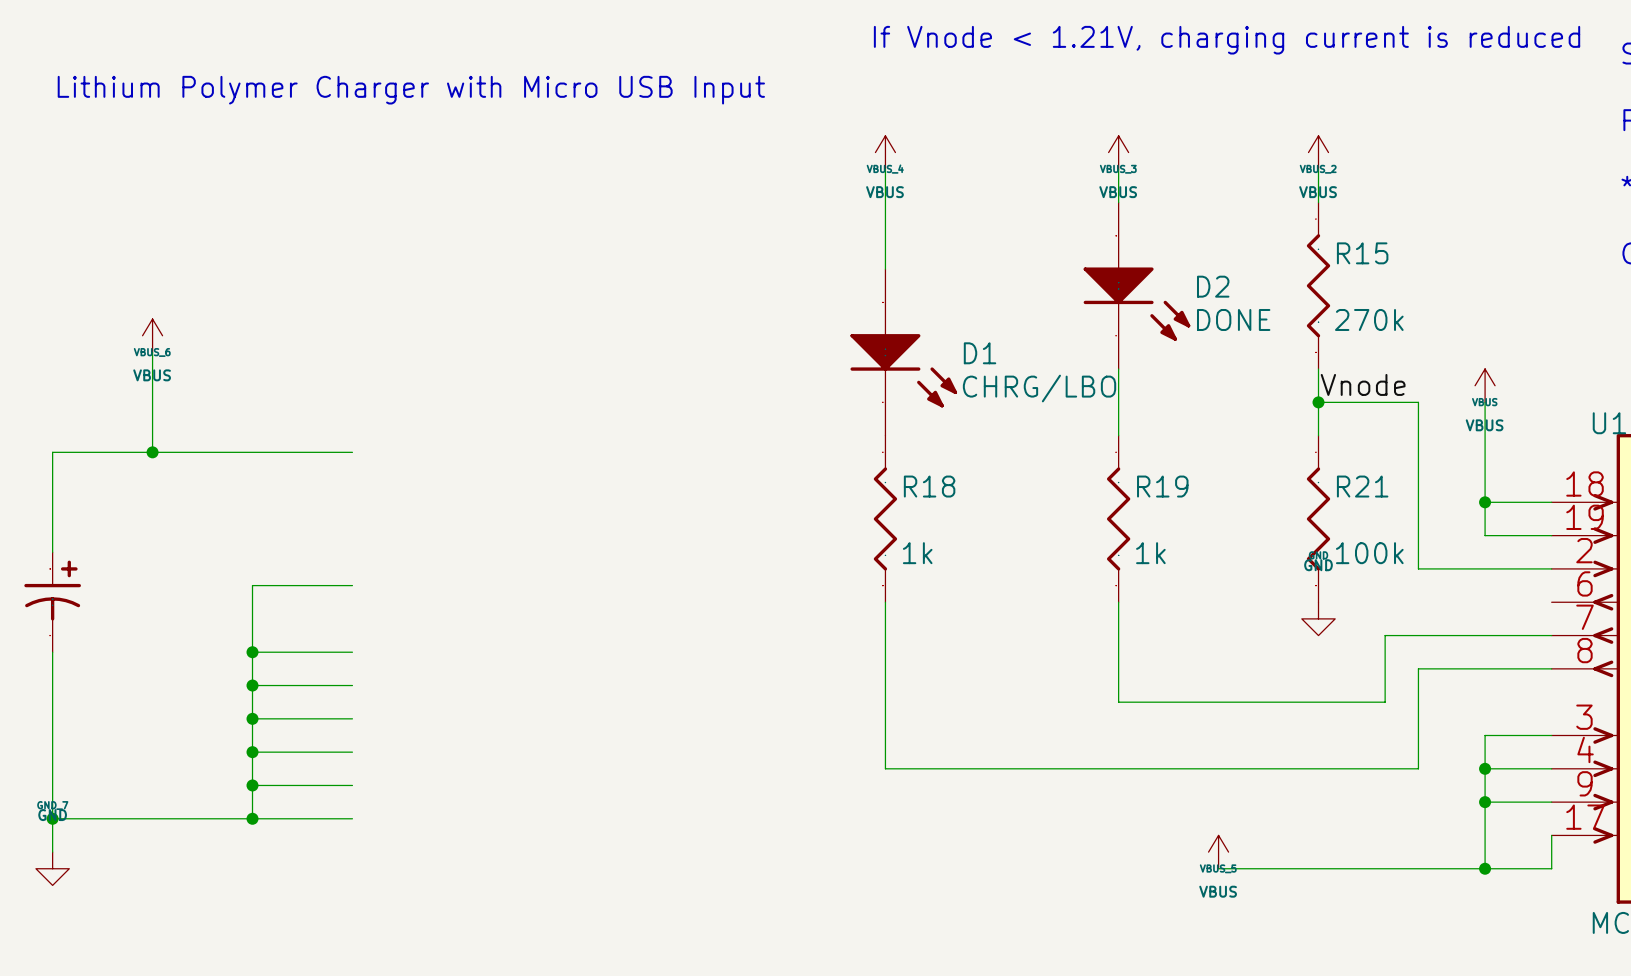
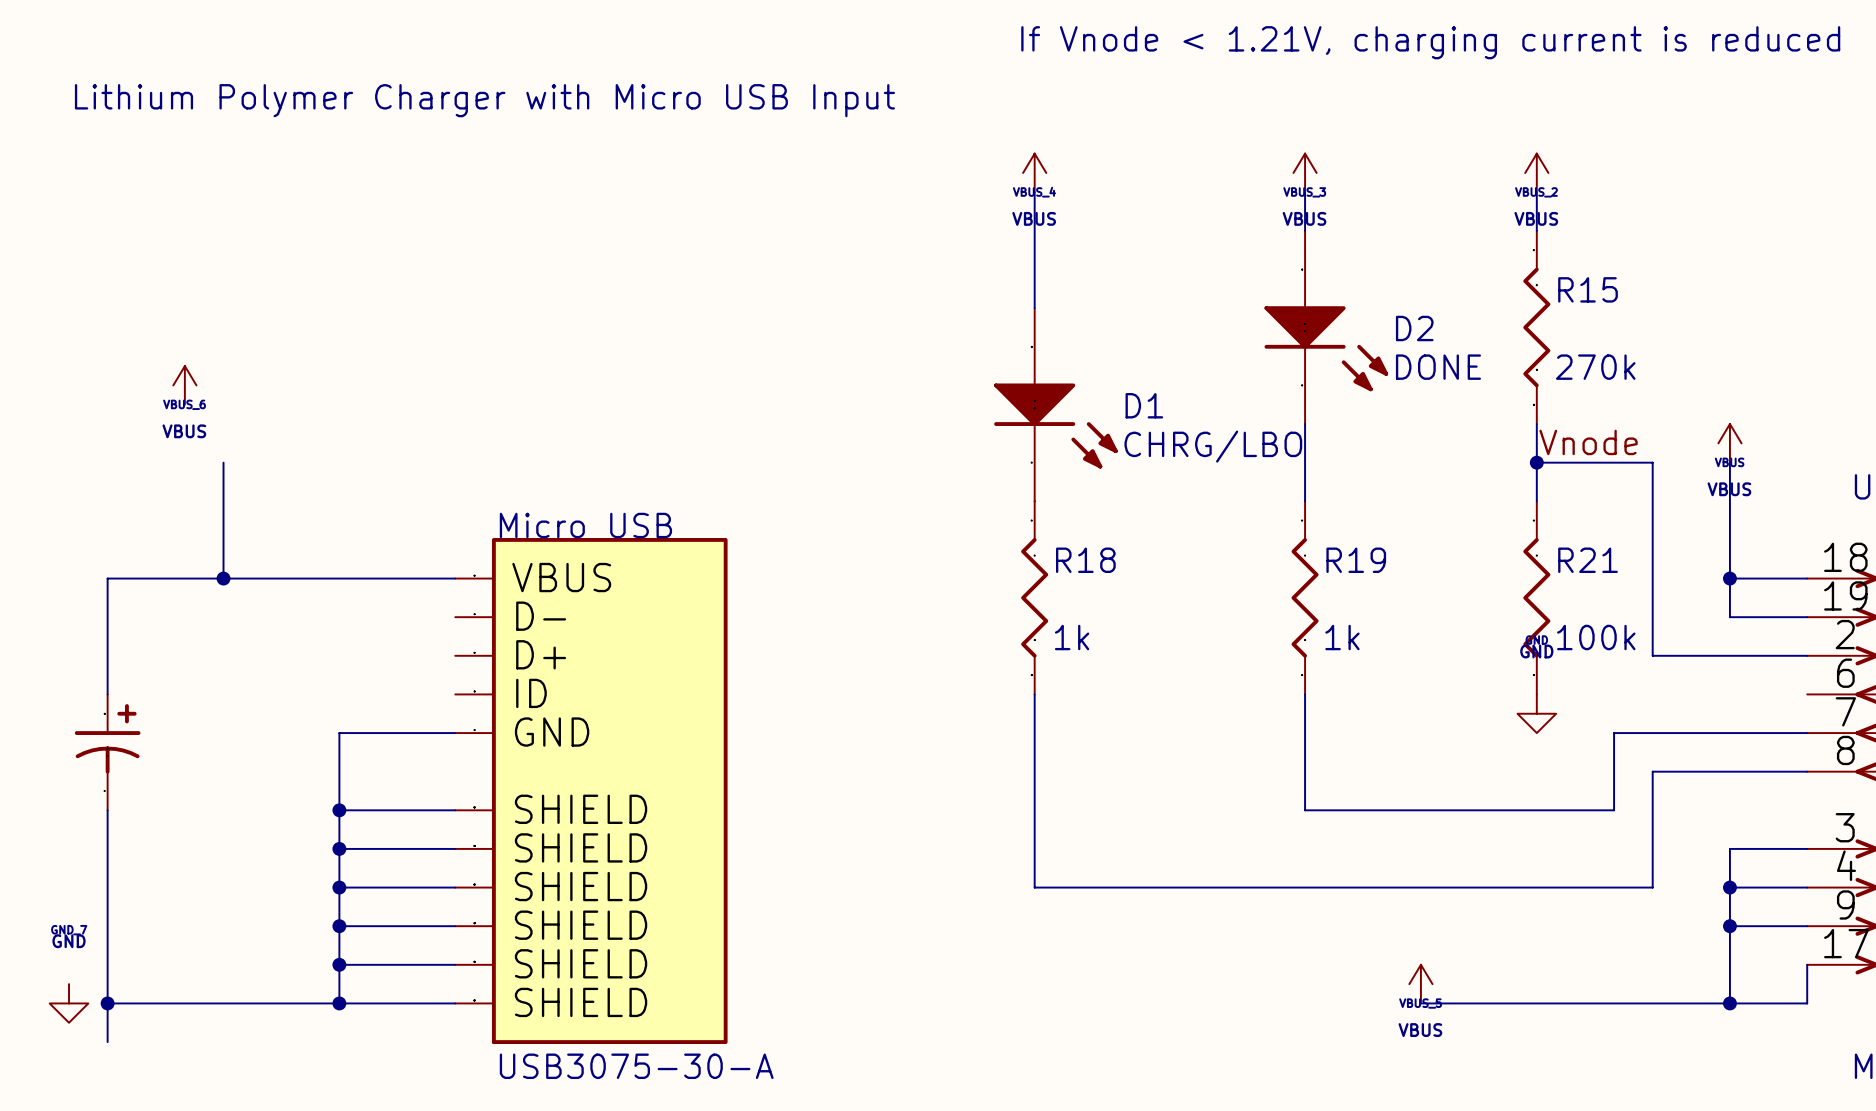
wire: (152, 352) (152, 452) -> (223, 462) (223, 578)
junction position: (152, 452) -> (223, 578)
wire: (352, 452) (52, 452) (52, 552) -> (455, 578) (107, 578) (107, 694)
wire: (352, 585) (252, 585) (252, 818) -> (455, 733) (339, 733) (339, 1003)
part position: (52, 602) -> (107, 752)
wire: (52, 652) (52, 852) -> (107, 810) (107, 1042)
wire: (252, 652) (352, 652) -> (339, 810) (455, 810)
junction: (252, 652) -> none
wire: (252, 685) (352, 685) -> (339, 848) (455, 848)
junction: (252, 685) -> none
Micro USB: none -> USB3075-30-A (591, 790)
junction: none -> (339, 810)
wire: (252, 718) (352, 718) -> (339, 887) (455, 887)
junction: (252, 718) -> none
junction: none -> (339, 848)
wire: (252, 752) (352, 752) -> (339, 926) (455, 926)
junction: (252, 752) -> none
junction: none -> (339, 887)
wire: (252, 785) (352, 785) -> (339, 964) (455, 964)
junction: (252, 785) -> none
junction: none -> (339, 926)
wire: (52, 818) (352, 818) -> (107, 1003) (455, 1003)
junction position: (52, 818) -> (107, 1003)
junction: (252, 818) -> none
junction: none -> (339, 964)
junction: none -> (339, 1003)

